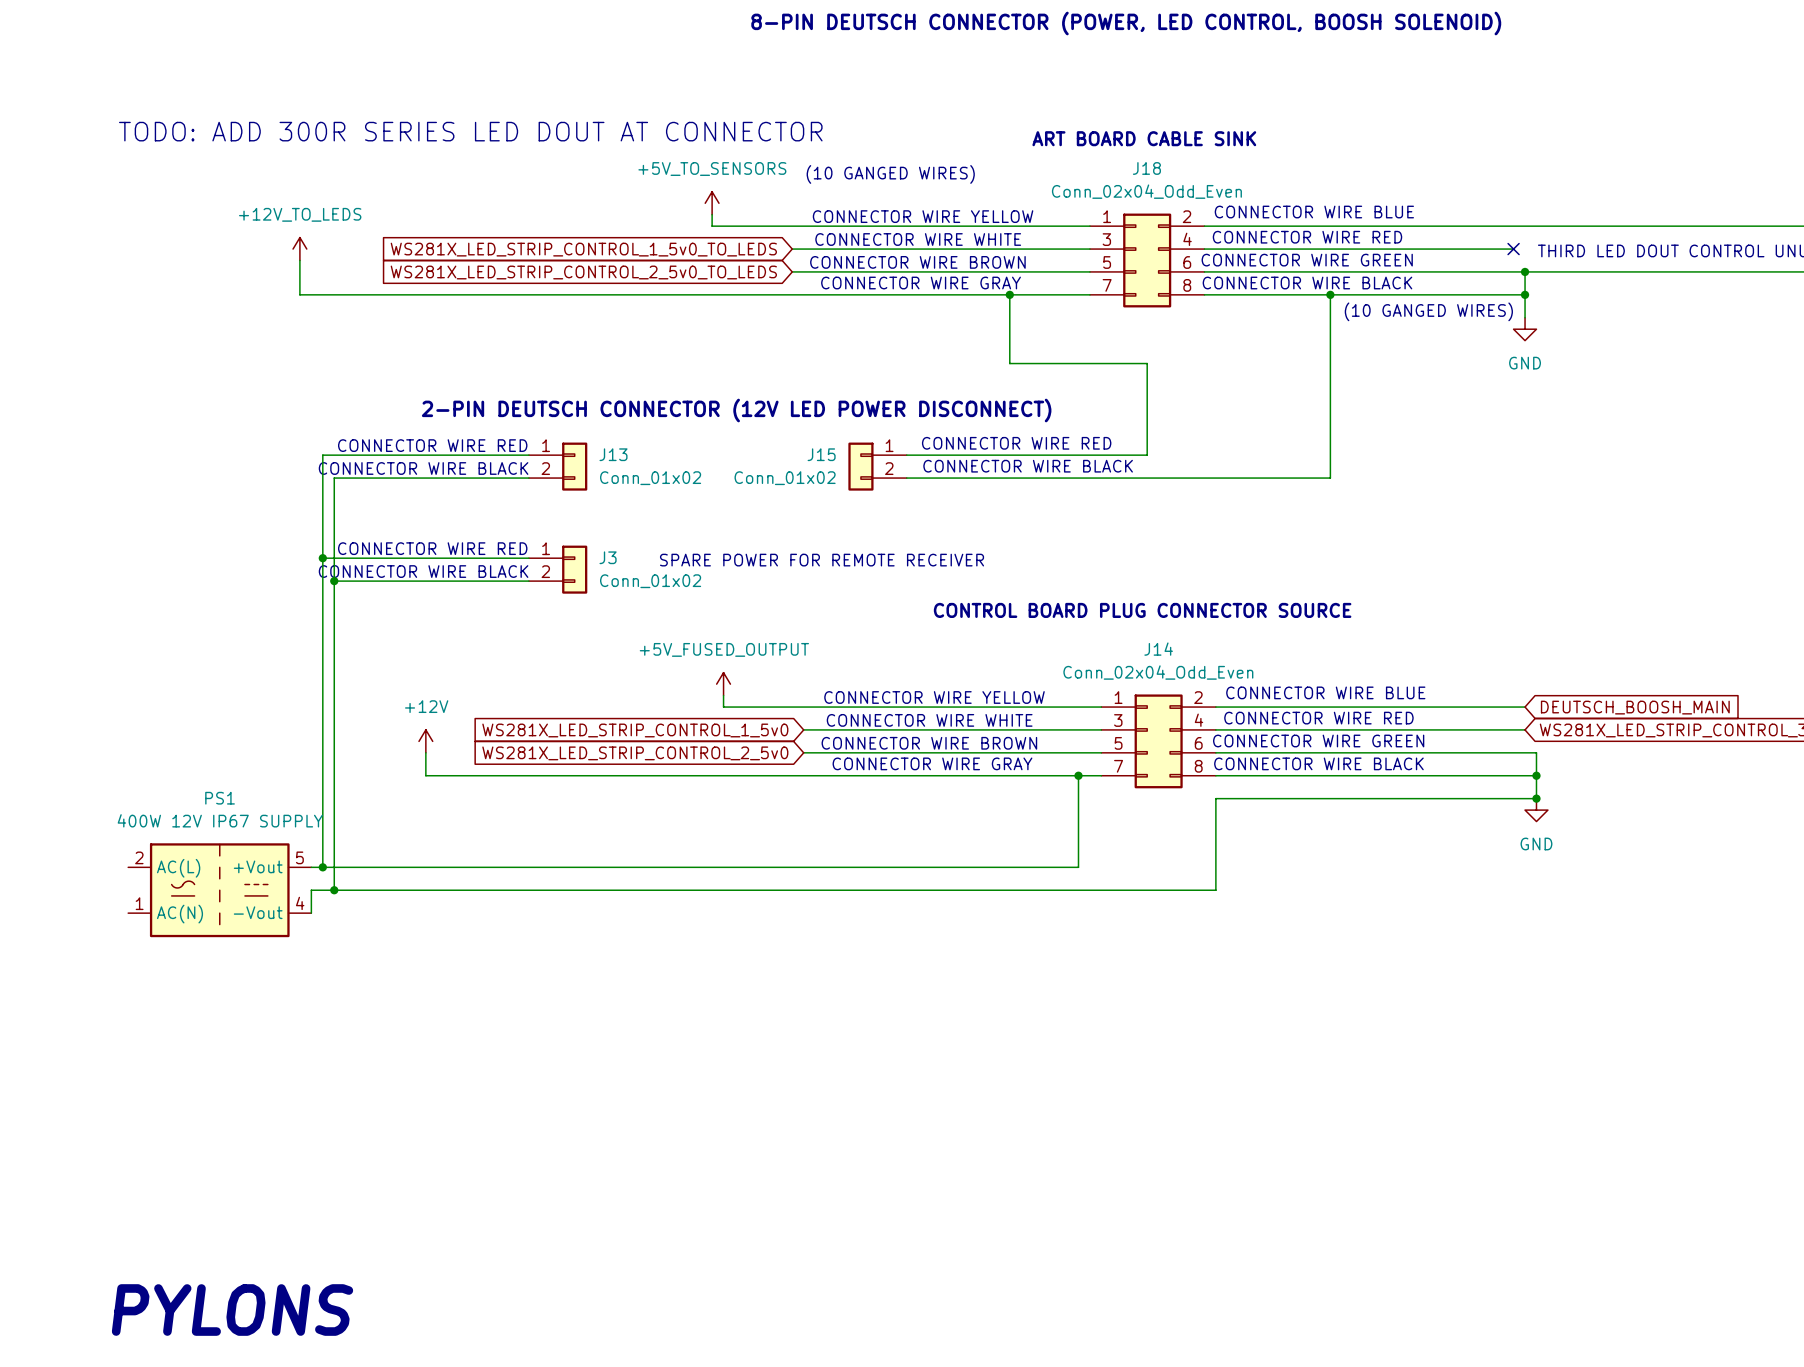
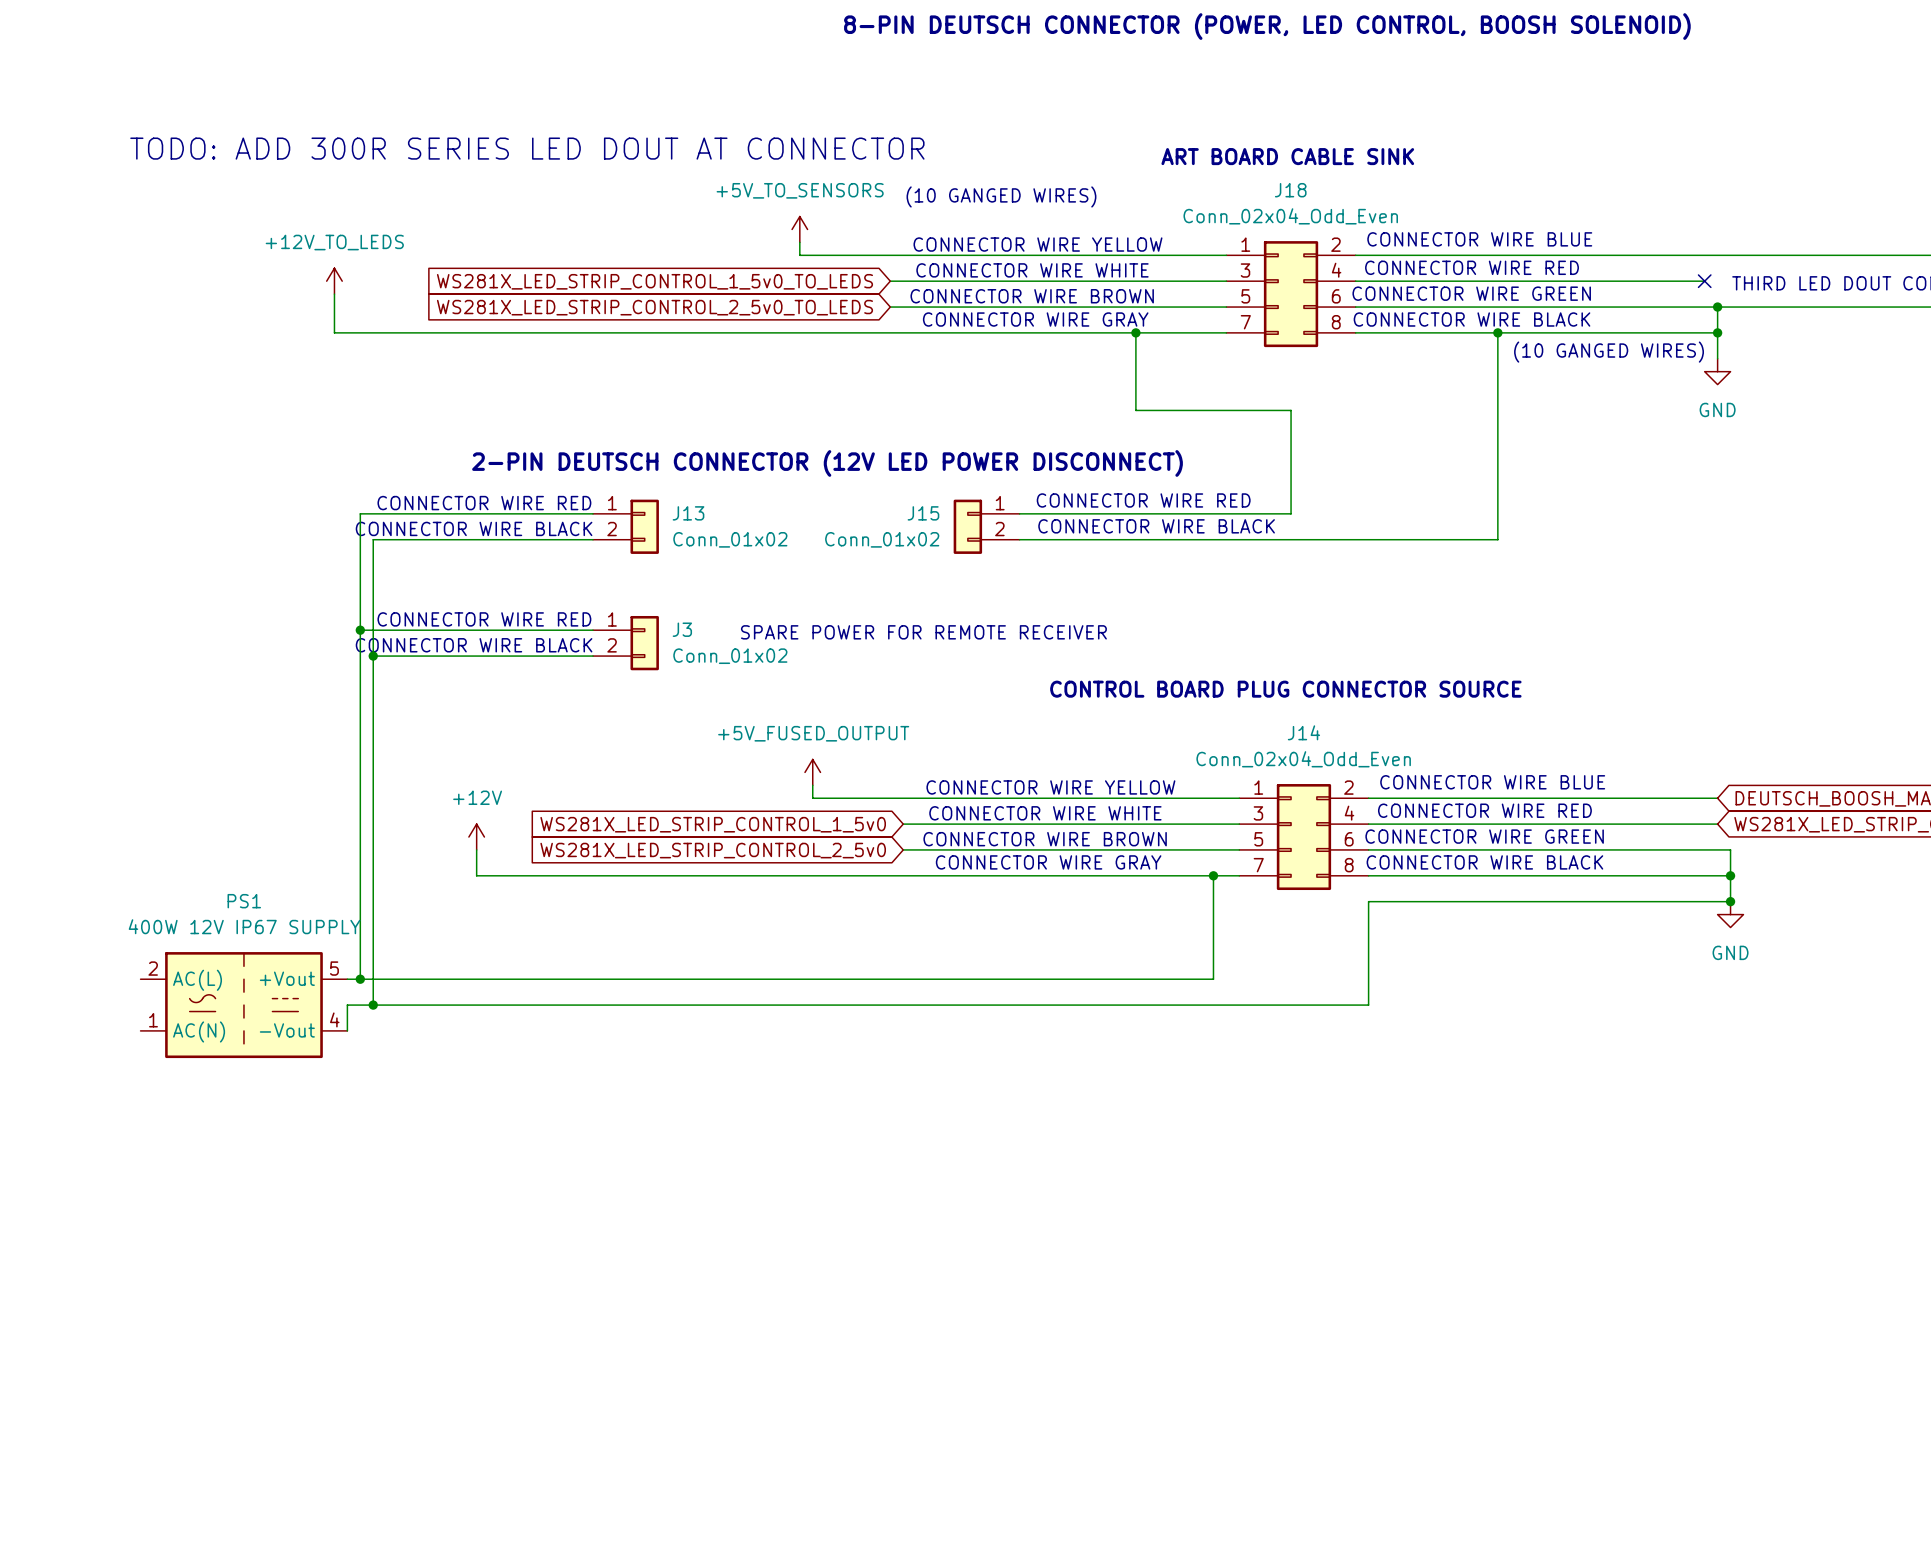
text: PYLONS (232, 1310) -> none

